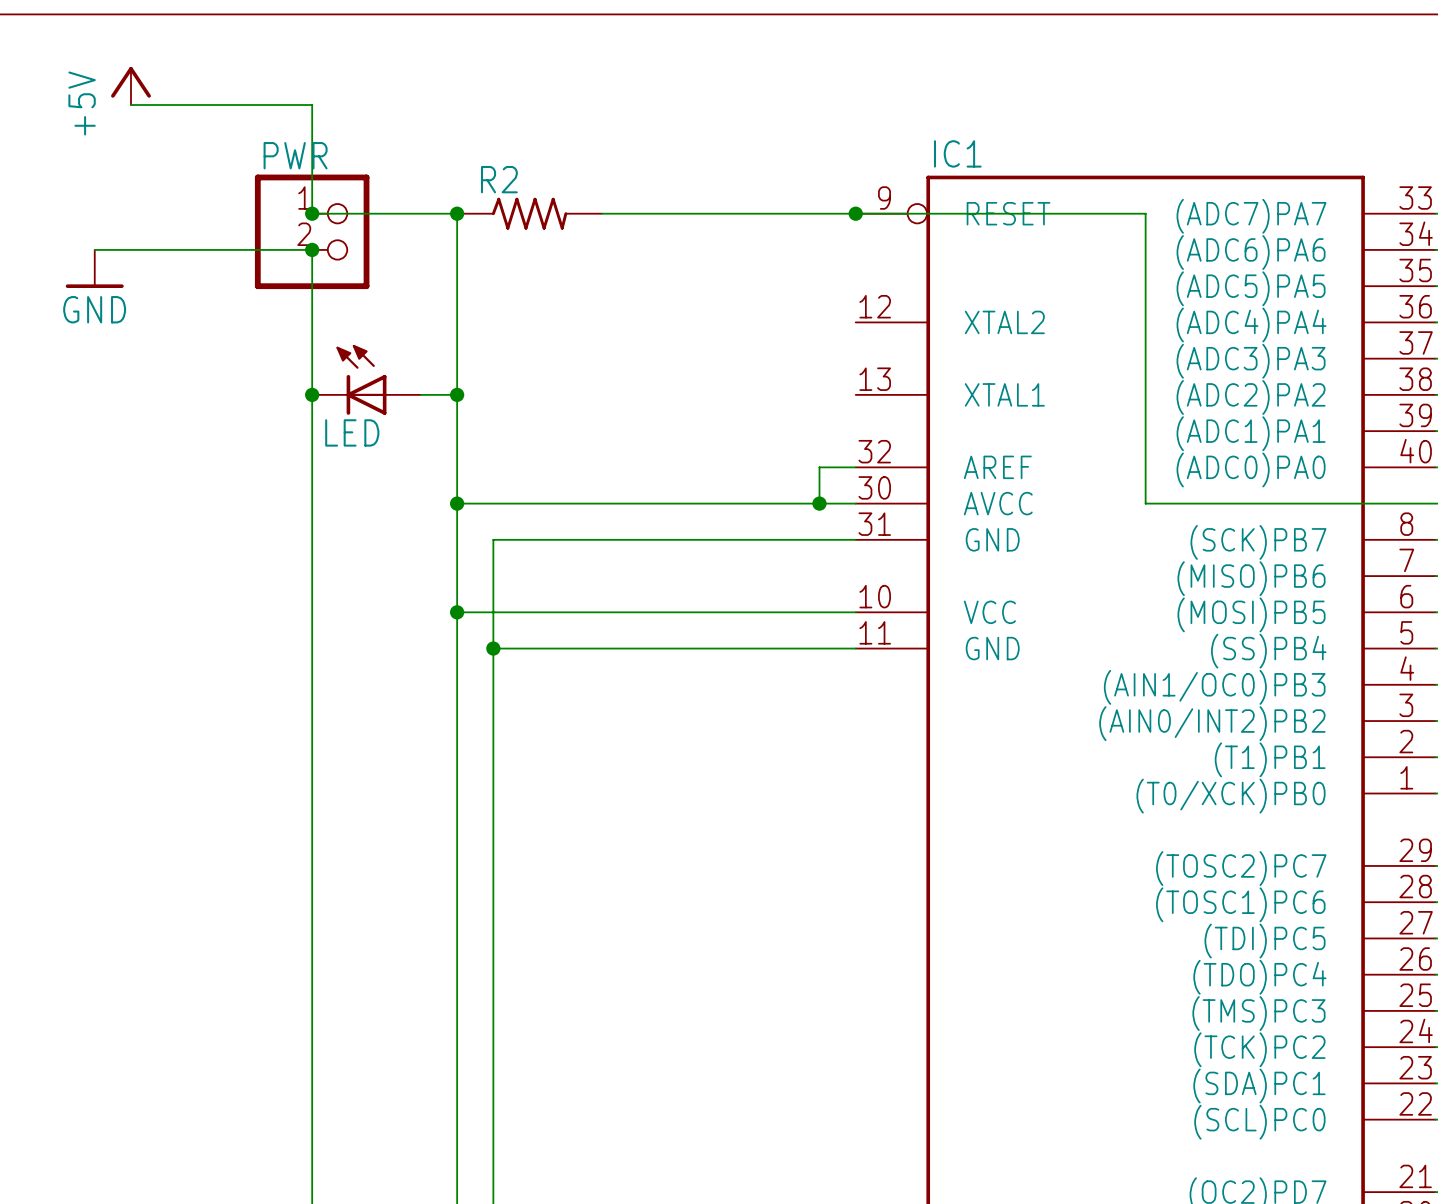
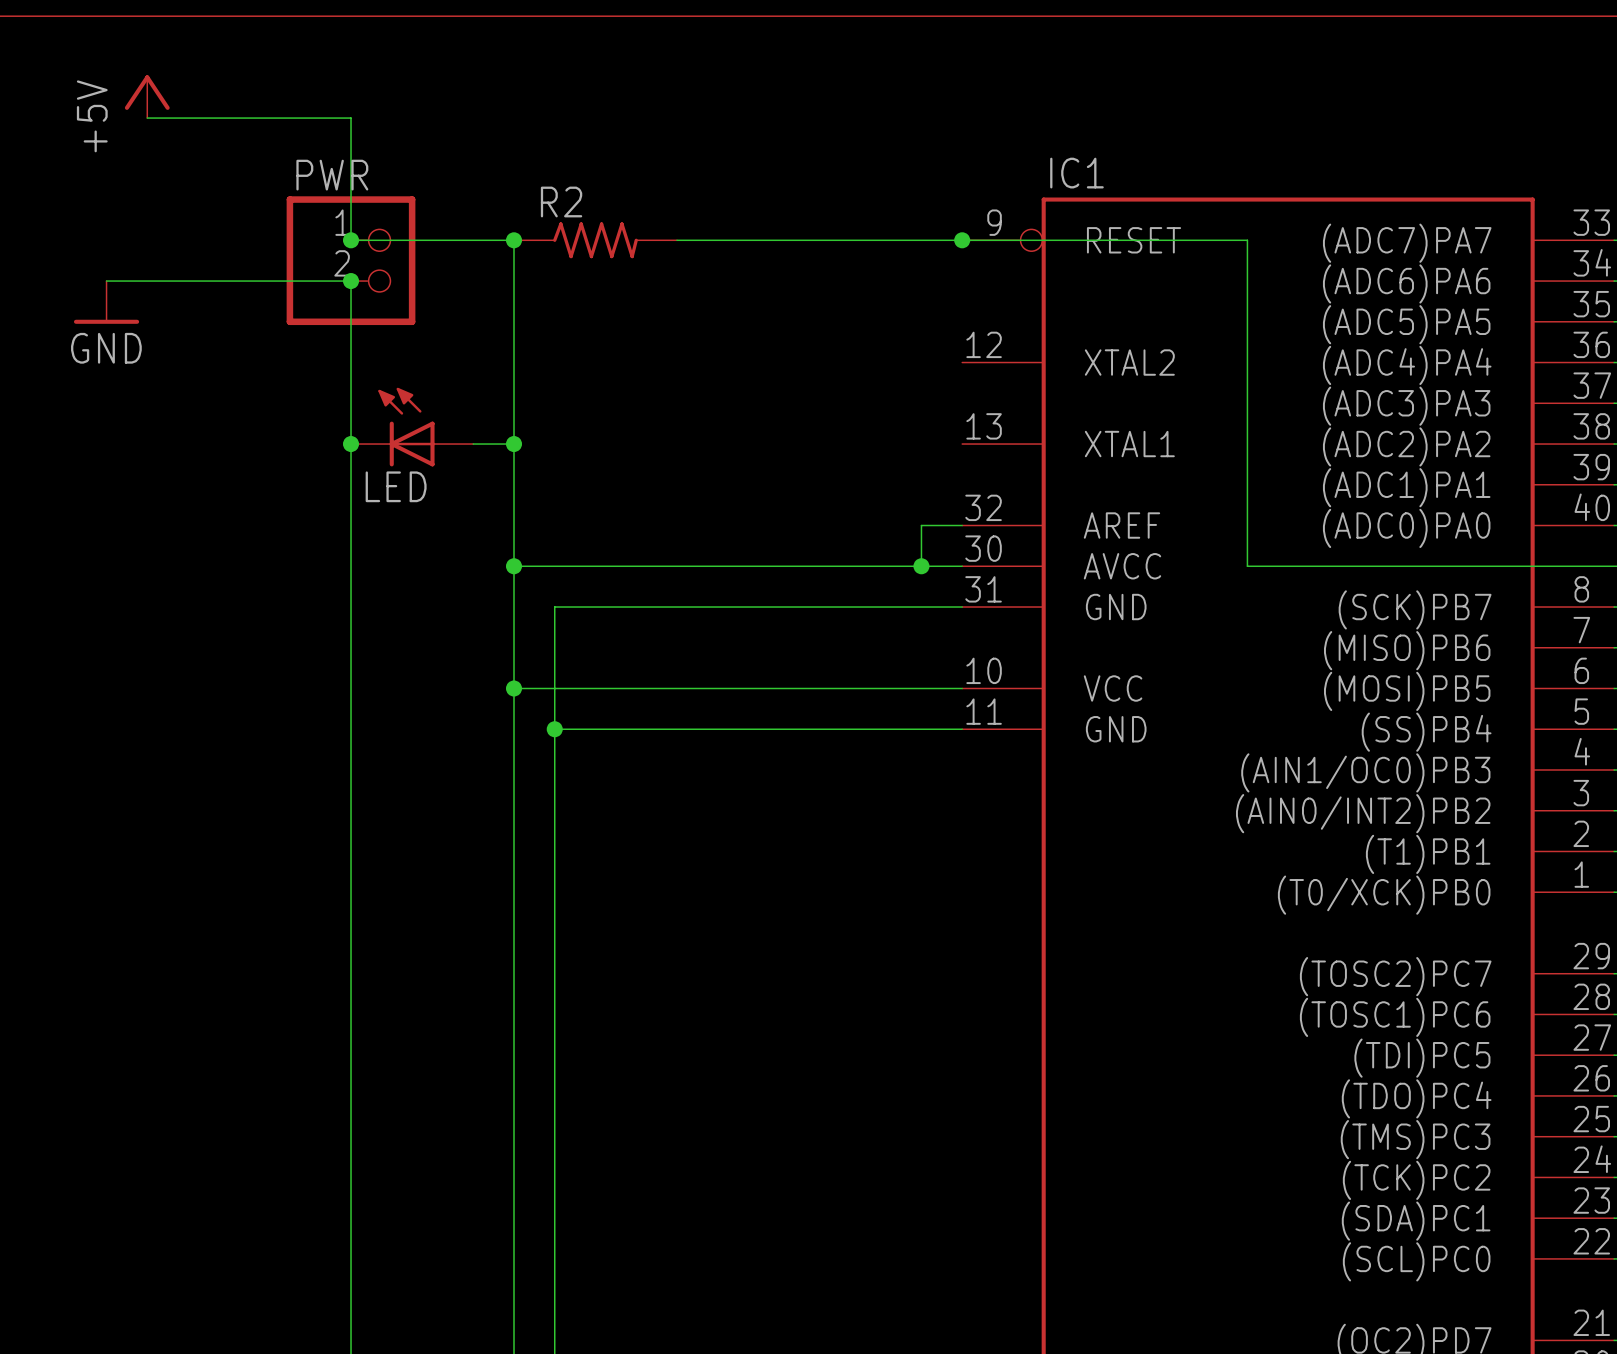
wire: (1109, 213) (1145, 213) (1145, 503) -> (1247, 240) (1247, 566) (1288, 566)

